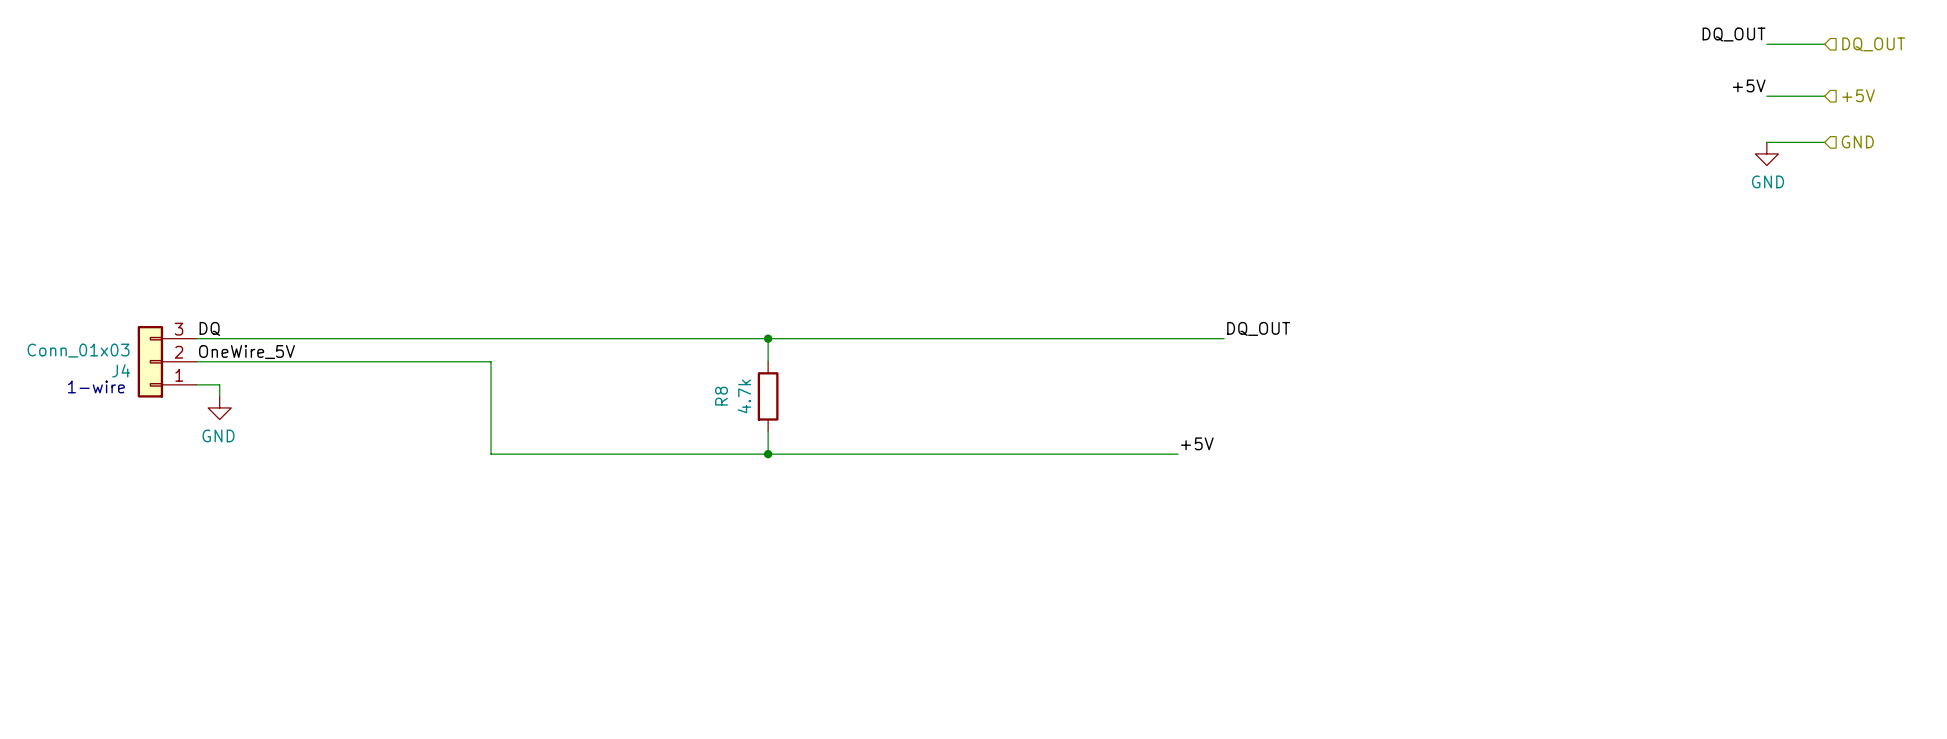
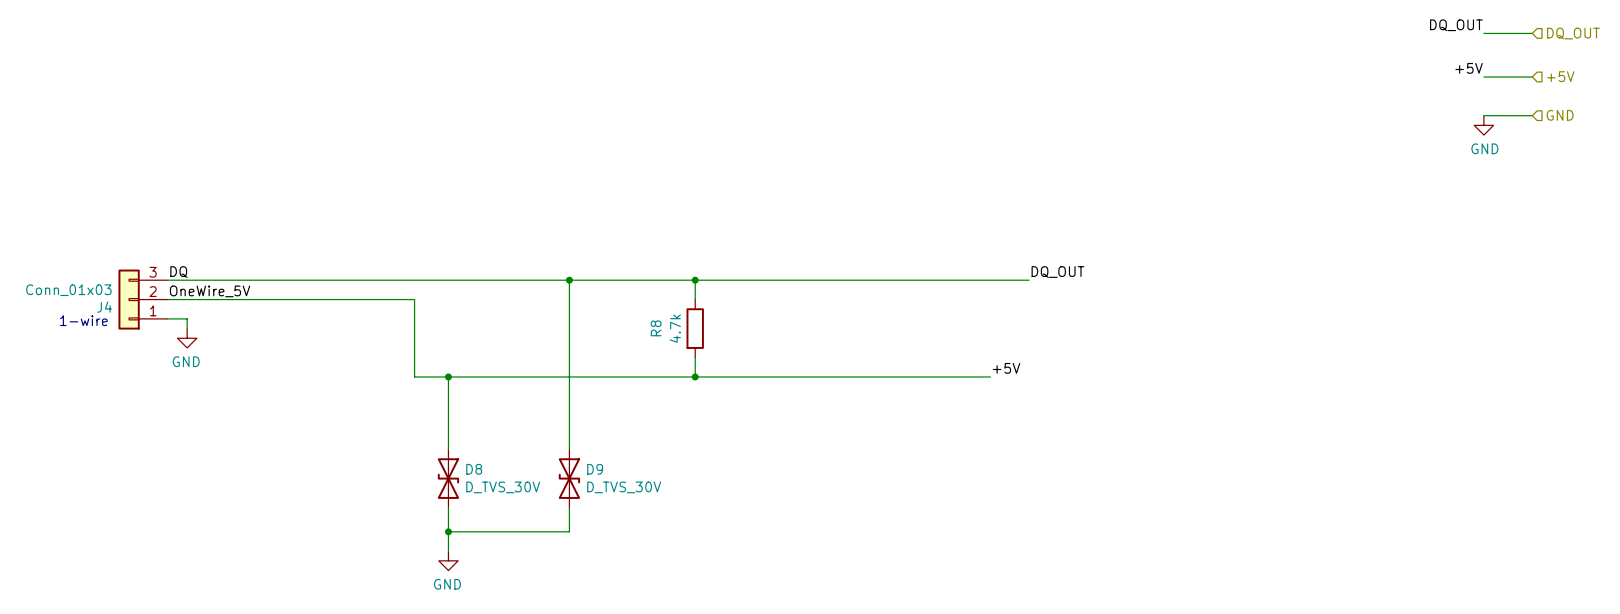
wire: none -> (569, 280) (569, 449)
junction: none -> (569, 280)
wire: (768, 338) (768, 361) -> (695, 280) (695, 299)
junction: (768, 338) -> none
junction: none -> (695, 280)
R8 position: (768, 396) -> (695, 328)
wire: (768, 431) (768, 454) -> (695, 357) (695, 376)
wire: none -> (448, 376) (448, 449)
junction: none -> (448, 376)
junction: (768, 454) -> none
junction: none -> (695, 376)
D8: none -> D_TVS_30V (448, 478)
D9: none -> D_TVS_30V (569, 478)
wire: none -> (448, 507) (448, 551)
wire: none -> (569, 507) (569, 531) (448, 531)
junction: none -> (448, 531)
power symbol: none -> GND (448, 560)

